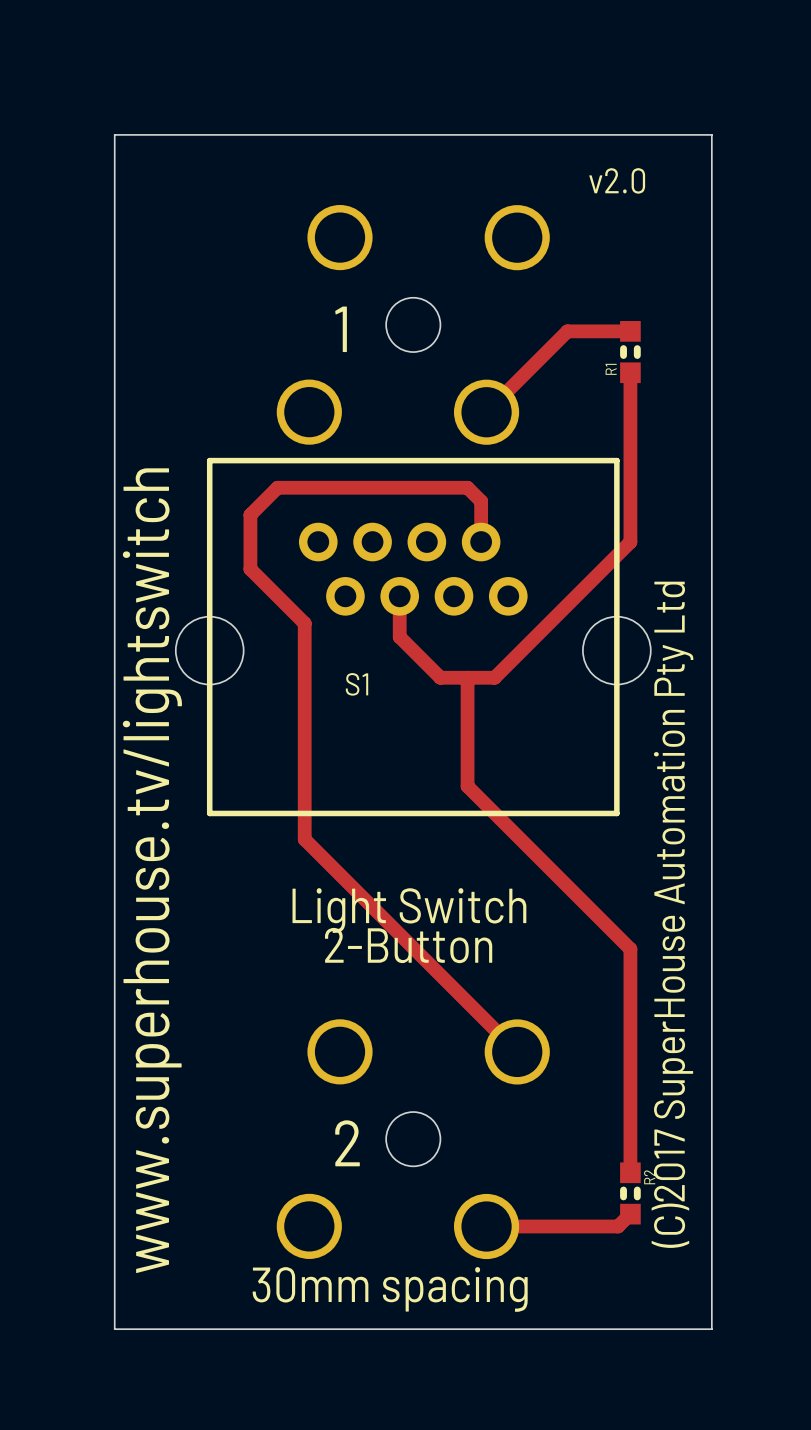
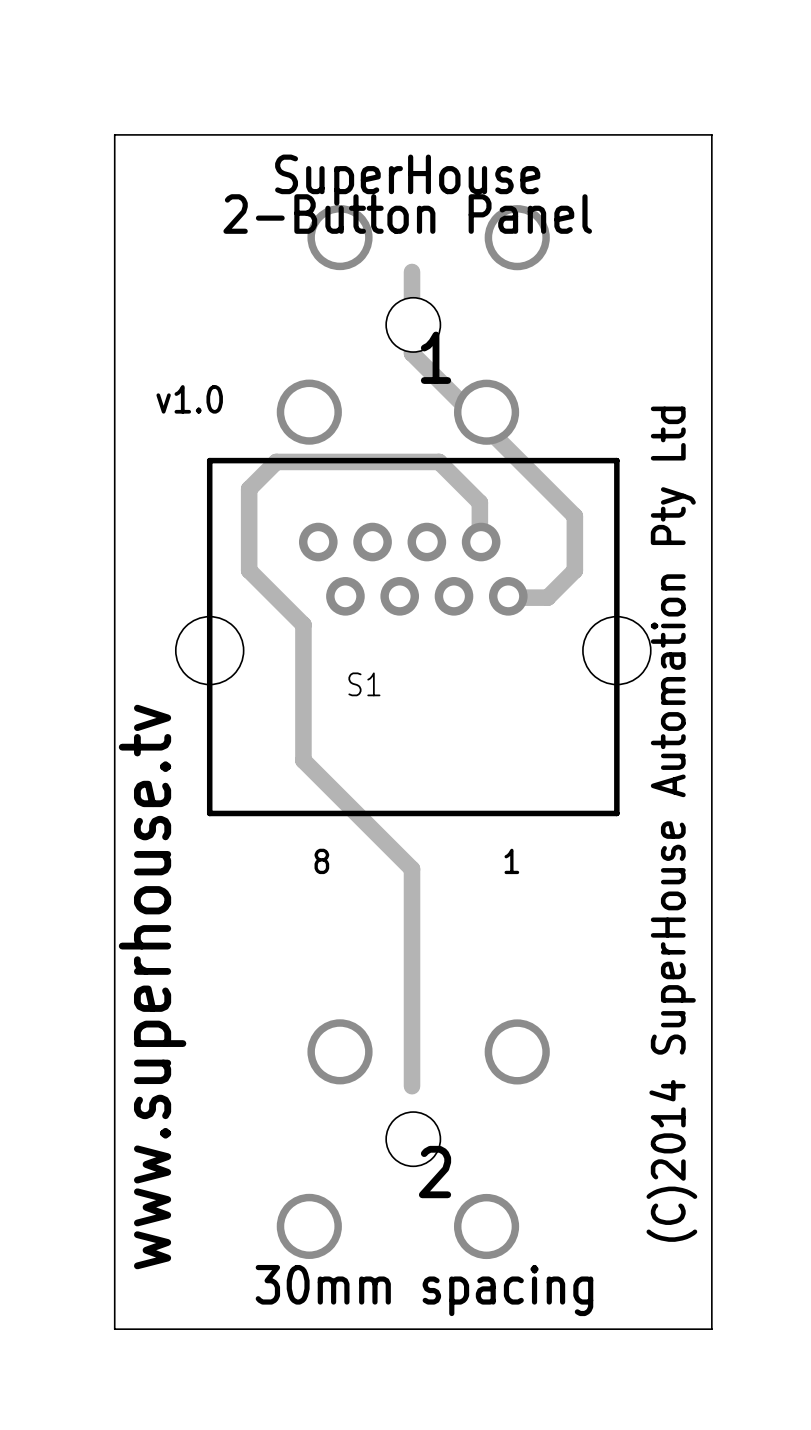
text: none -> SuperHouse (407, 180)
text: v2.0 (617, 180) -> none
text: none -> 2-Button Panel (407, 214)
track: none -> (412, 271) (412, 353) (574, 516) (574, 570) (547, 597) (507, 597)
text position: 1 (341, 329) -> 1 (436, 357)
track: (630, 331) (567, 331) (486, 412) -> none
R1: (630, 352) -> none
track: (630, 372) (630, 542) (494, 677) (440, 677) (399, 637) (399, 596) -> none
text: none -> v1.0 (189, 399)
track: (481, 542) (481, 501) (467, 487) (277, 487) (250, 514) (250, 569) (304, 623) (304, 839) (517, 1051) -> none
track: none -> (479, 543) (479, 502) (439, 461) (276, 461) (249, 489) (249, 570) (303, 624) (303, 760) (412, 869) (412, 1086)
track: (467, 677) (467, 786) (630, 949) (630, 1172) -> none
text: none -> 8 (321, 861)
text: none -> 1 (511, 861)
text: www.superhouse.tv/lightswitch (152, 870) -> www.superhouse.tv (152, 987)
text: Light Switch (409, 910) -> none
text: (C)2017 SuperHouse Automation Pty Ltd (672, 914) -> (C)2014 SuperHouse Automation Pty Ltd (671, 824)
text: 2-Button (408, 945) -> none
text position: 2 (347, 1143) -> 2 (435, 1172)
R2: (630, 1193) -> none
track: (630, 1214) (618, 1226) (486, 1226) -> none

